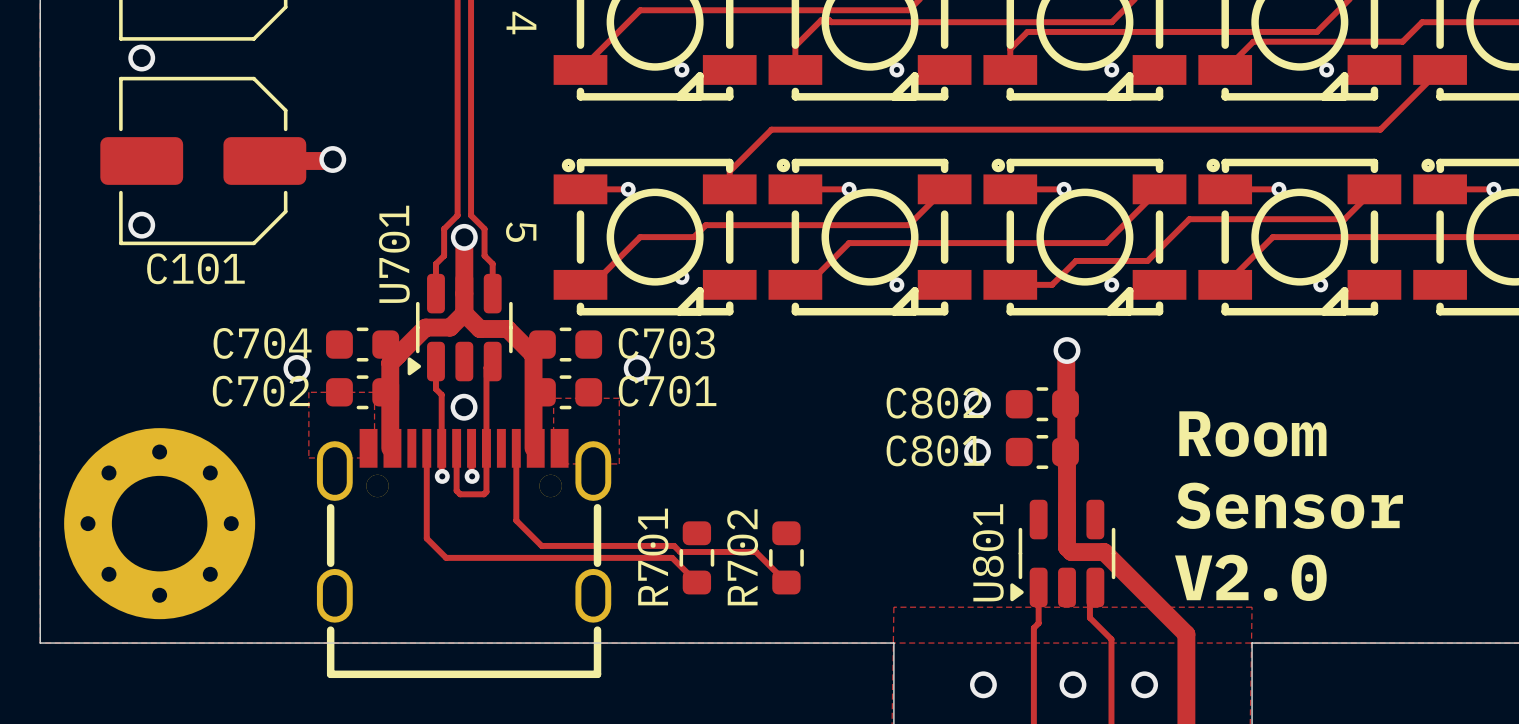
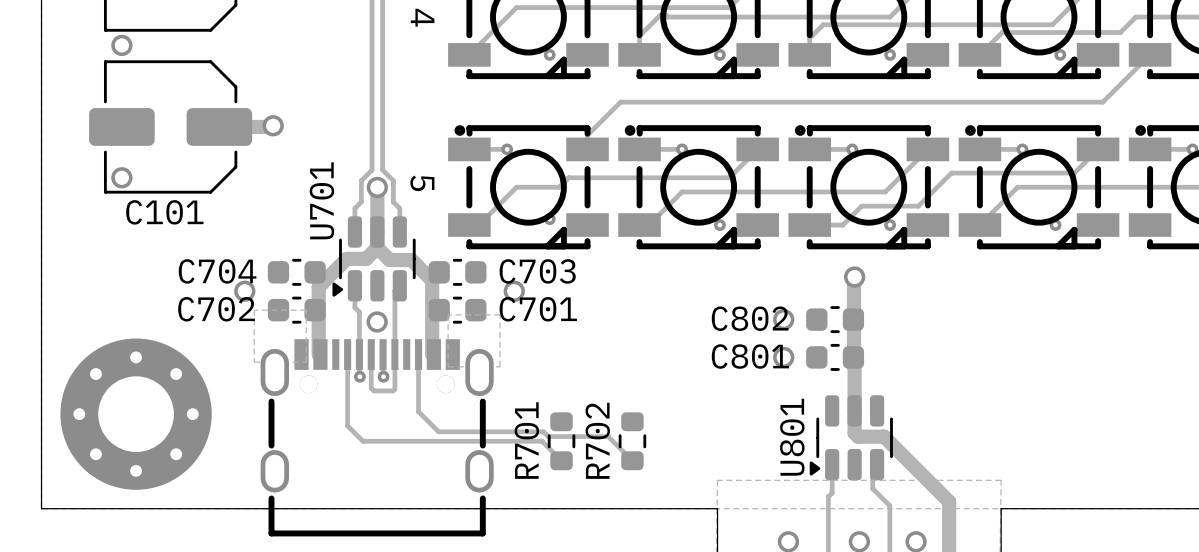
text: Room (1252, 434) -> none
text: Sensor (1289, 505) -> none
text: V2.0 (1250, 577) -> none

